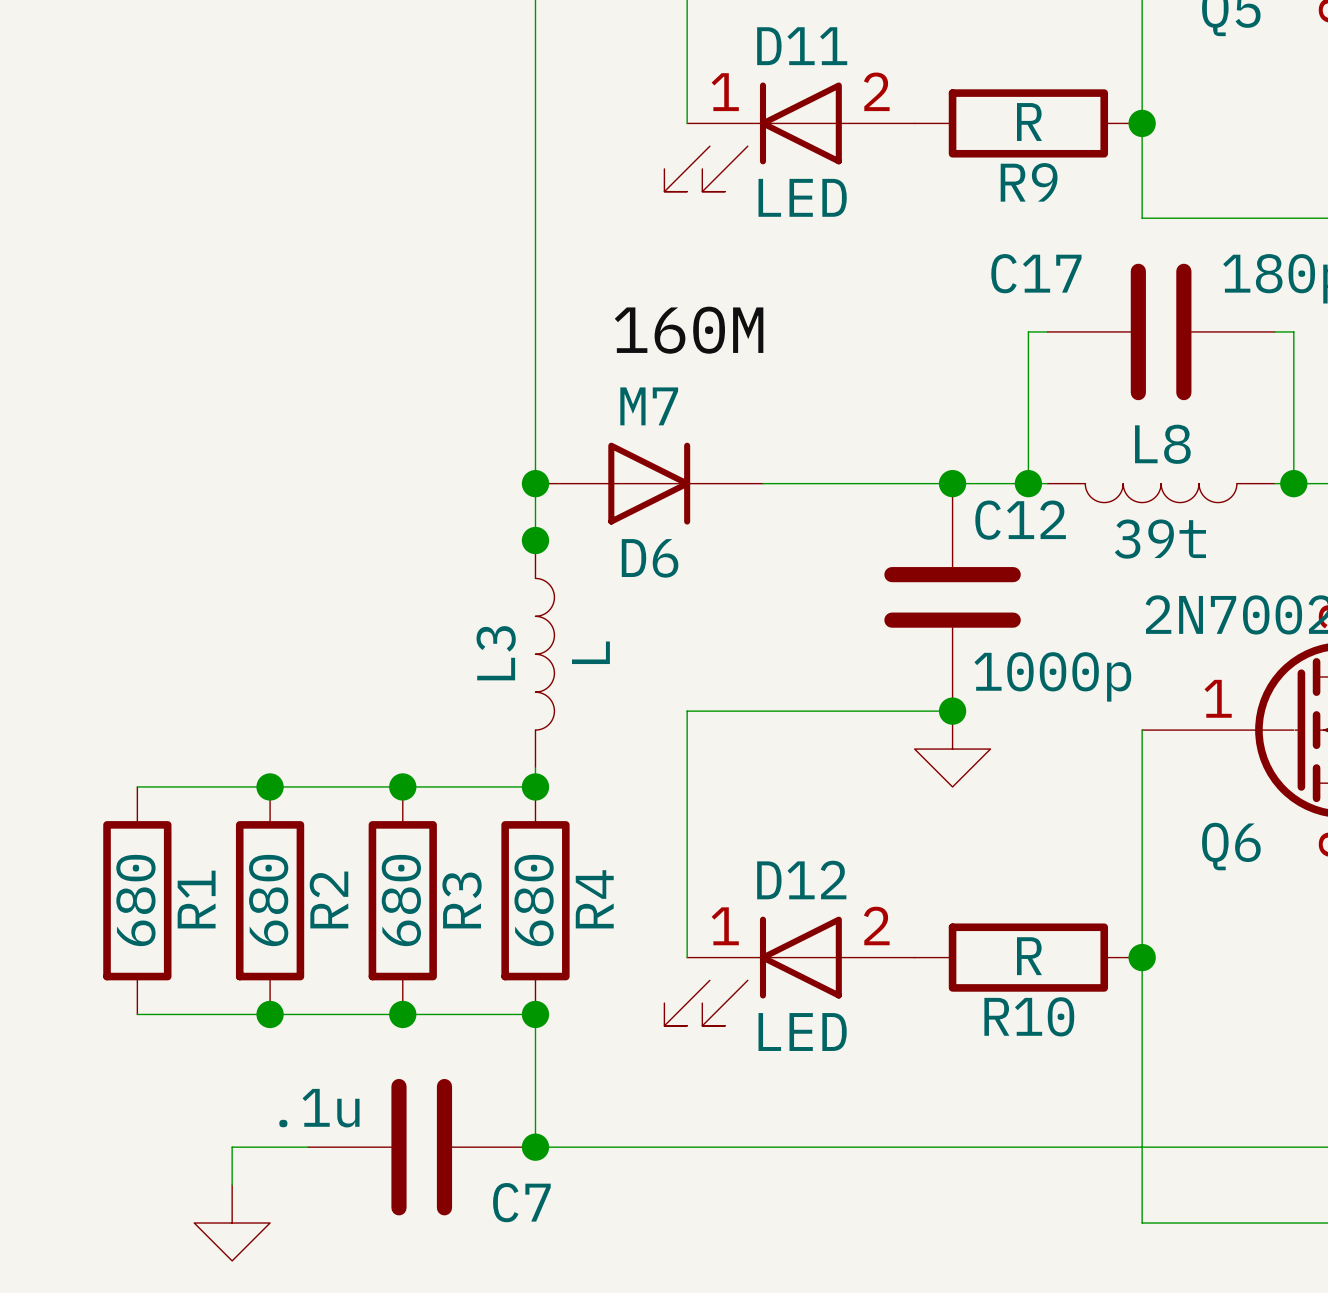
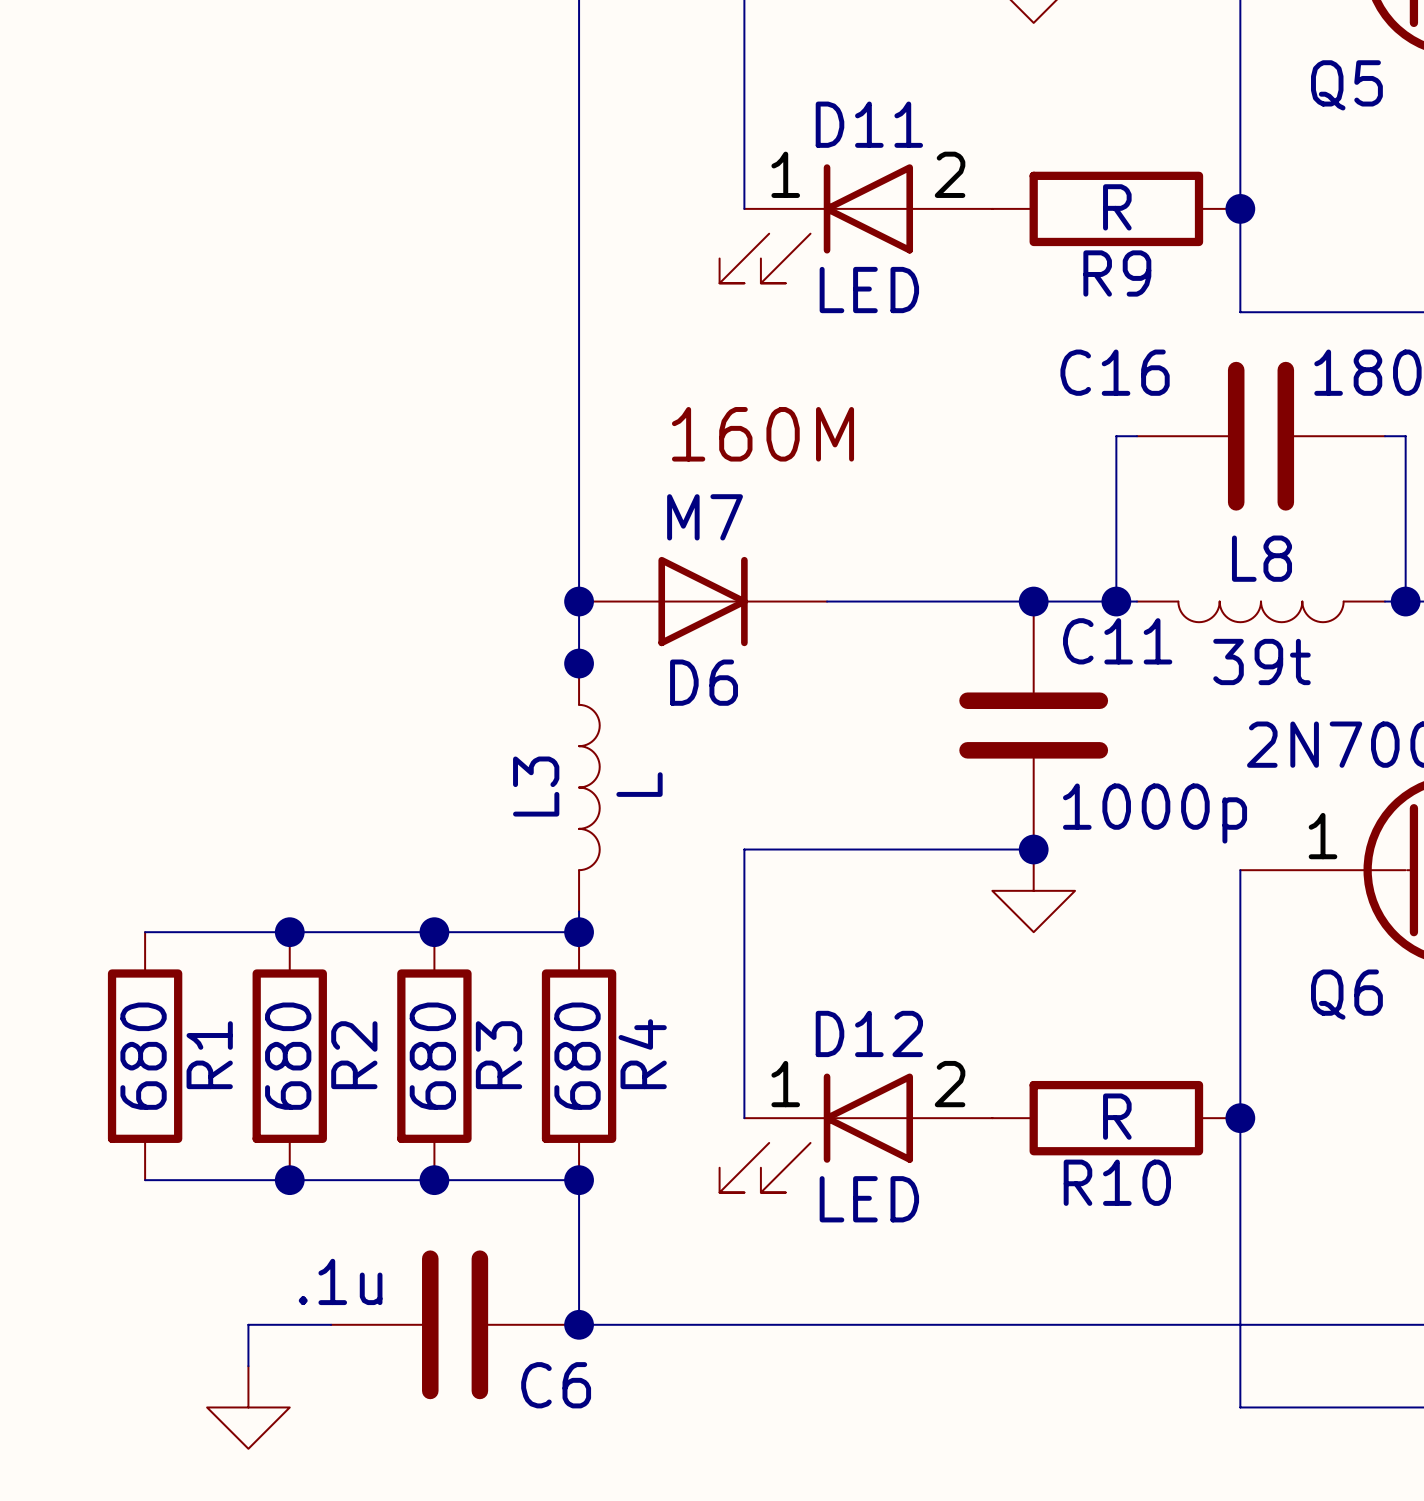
C17 name: C17 (1036, 273) -> C16 (1115, 372)
C12 name: C12 (1020, 520) -> C11 (1117, 641)
C7 name: C7 (521, 1202) -> C6 (556, 1385)

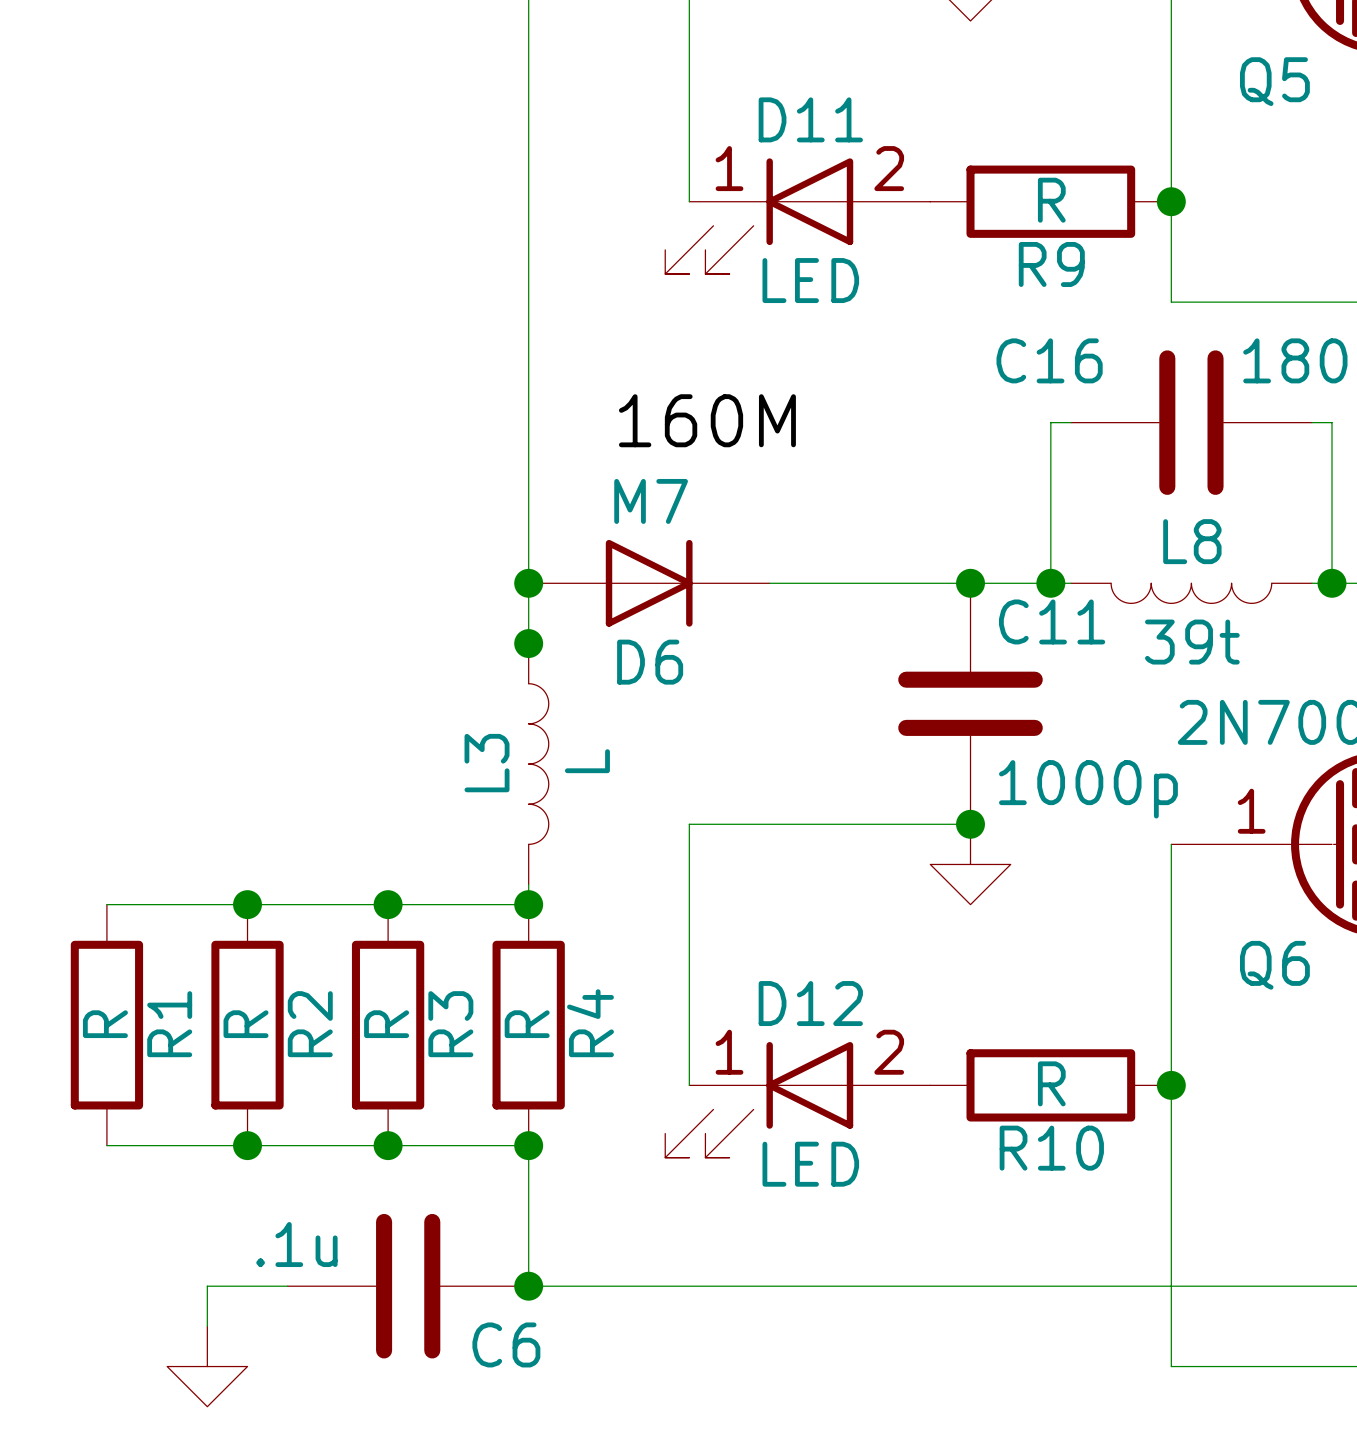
R1 value: 680 (143, 1056) -> R (105, 1024)
R2 value: 680 (288, 1056) -> R (246, 1024)
R3 value: 680 (432, 1056) -> R (386, 1024)
R4 value: 680 (577, 1056) -> R (527, 1024)

